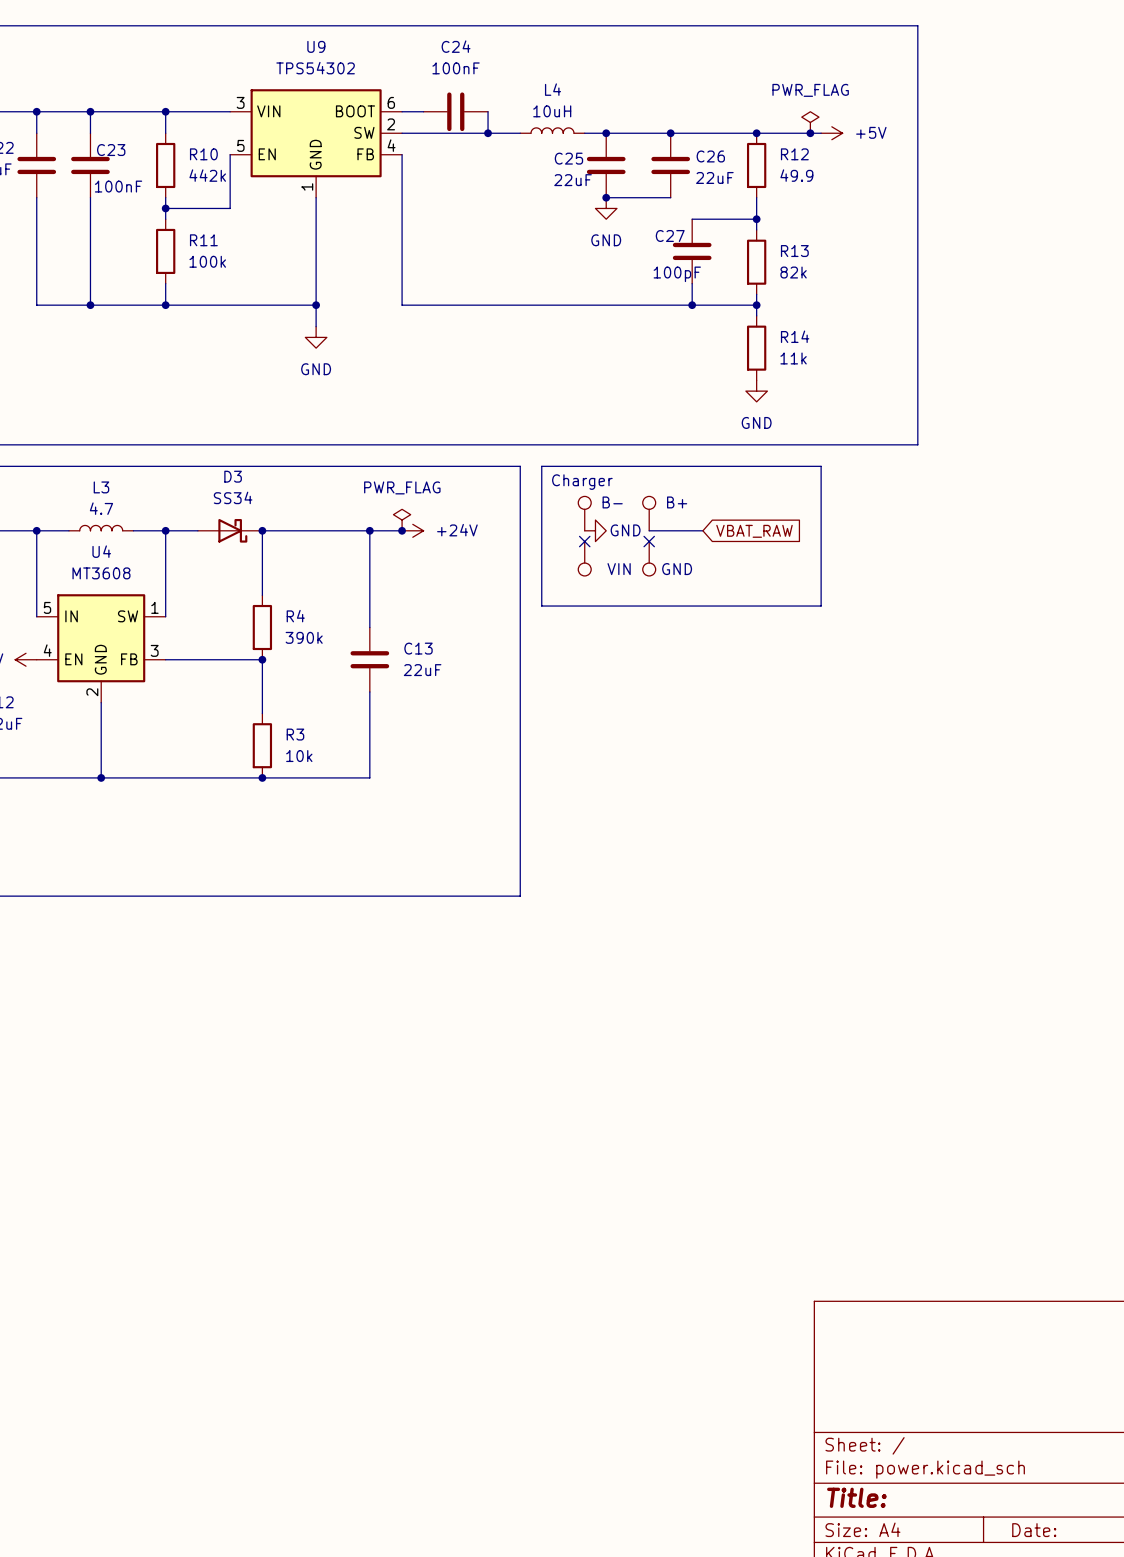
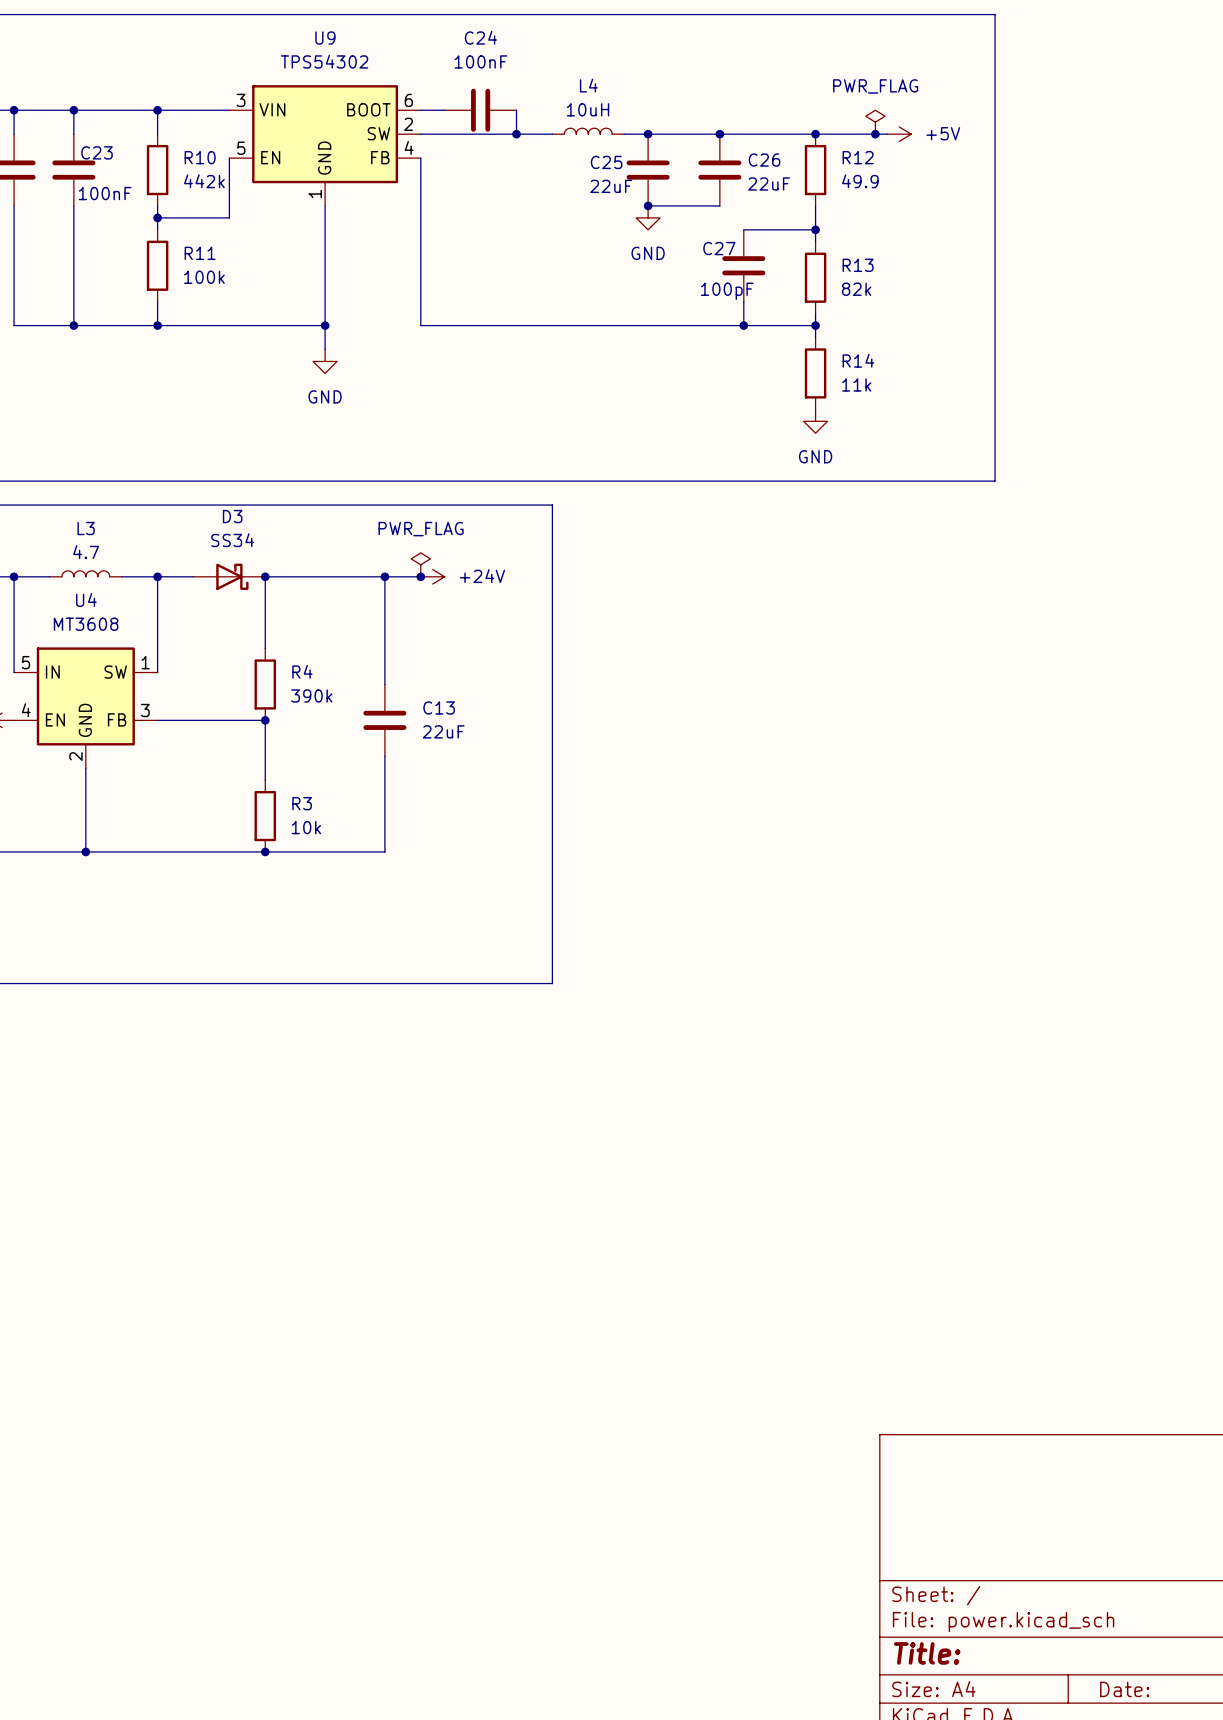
line: (541, 466) (821, 466) (821, 606) (541, 606) (541, 466) -> none
text: Charger (582, 482) -> none
part: B- (584, 513) -> none
part: B+ (649, 513) -> none
power symbol: GND (595, 530) -> none
wire: (649, 530) (702, 530) -> none
global label: VBAT_RAW (754, 531) -> none
no-connect mark: (584, 541) -> none
no-connect mark: (649, 541) -> none
part: VIN (584, 558) -> none
part: GND (649, 558) -> none

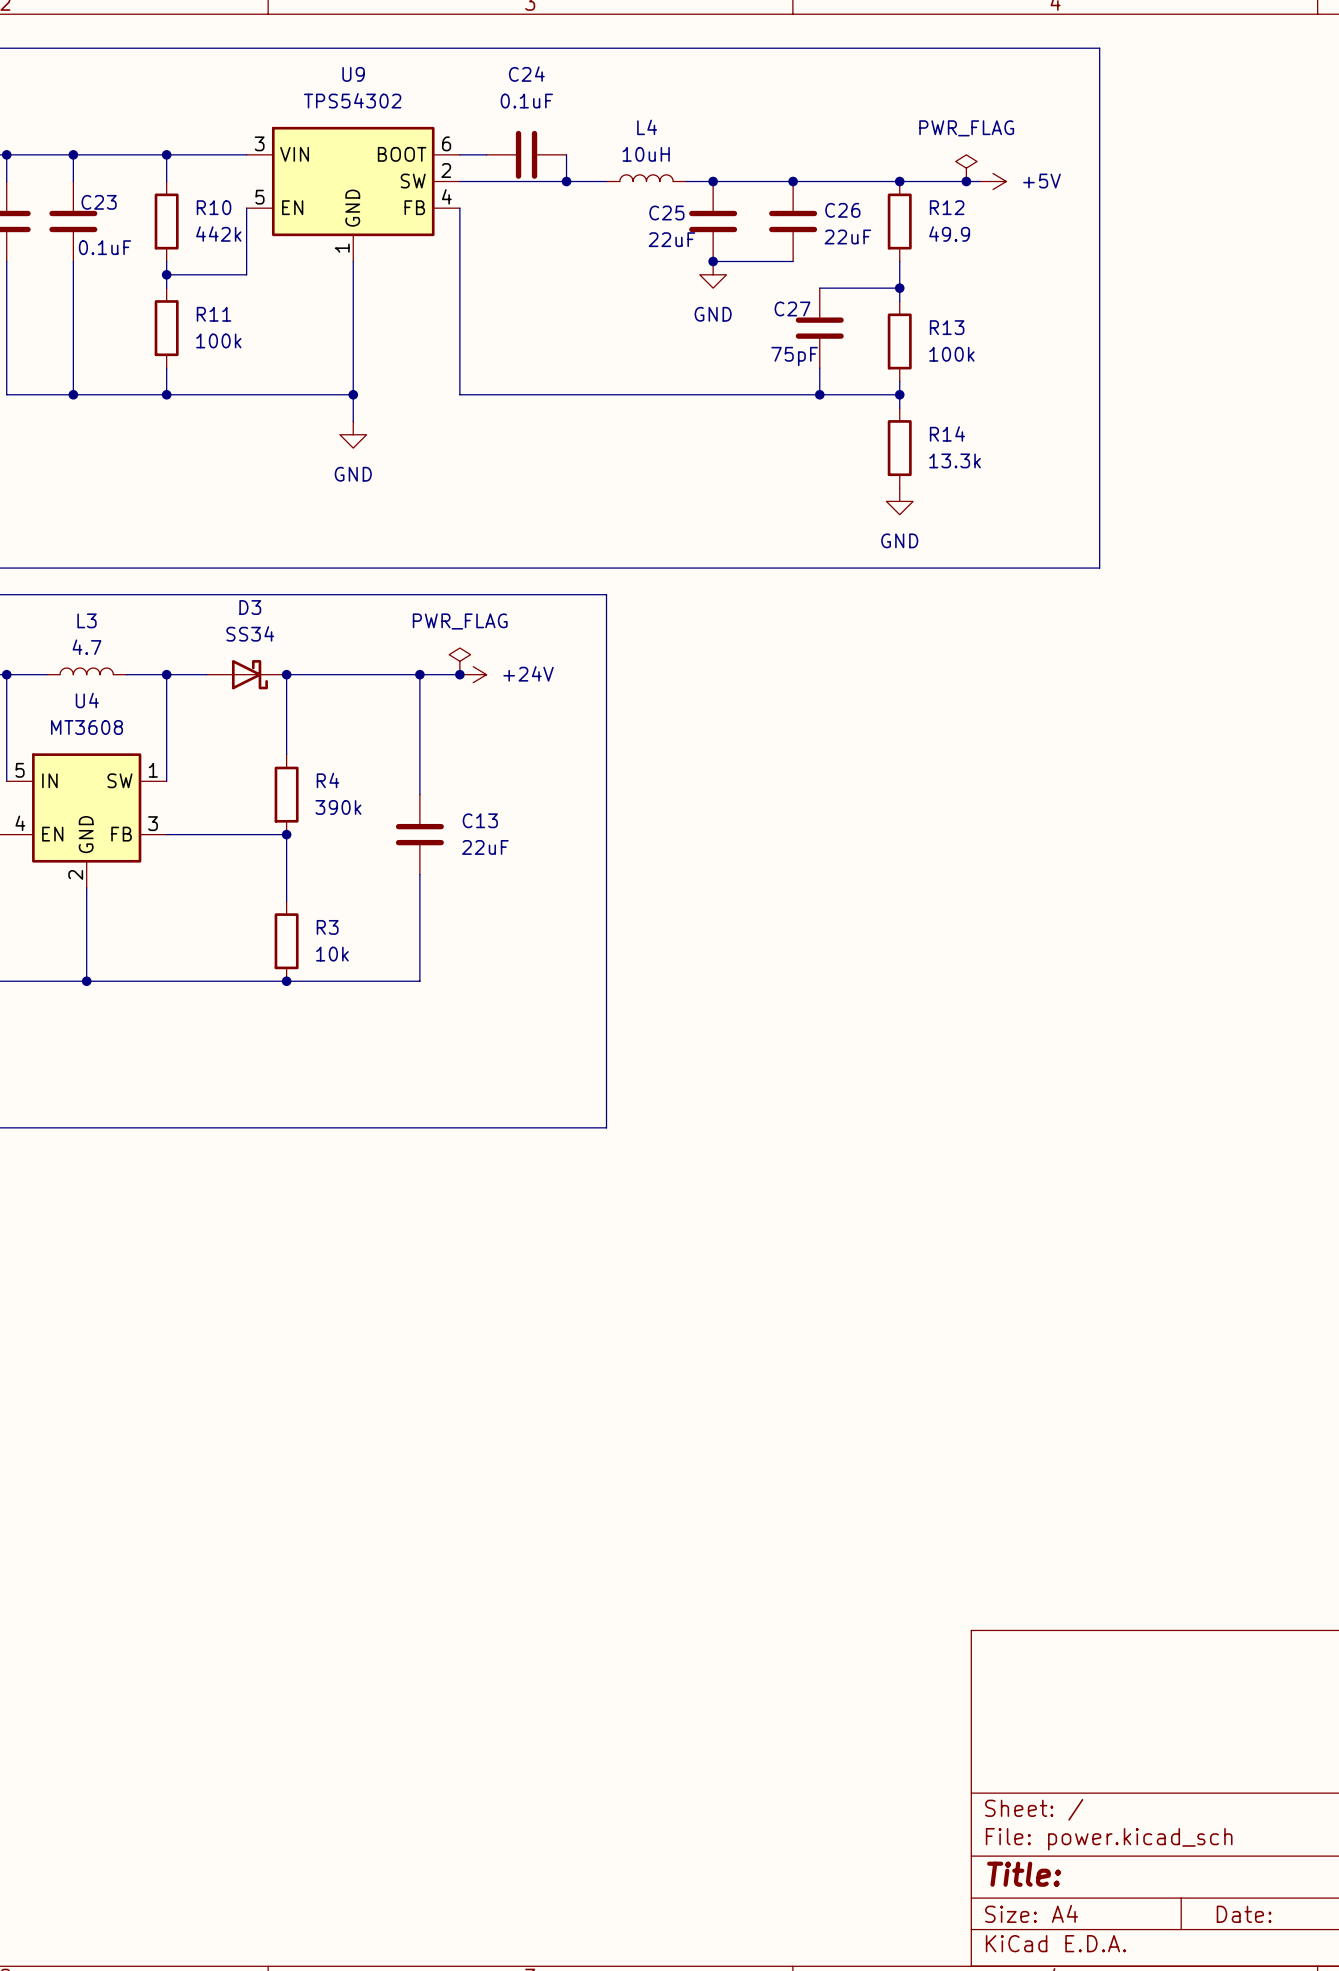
C24 value: 100nF (480, 61) -> 0.1uF (526, 101)
C23 value: 100nF (105, 193) -> 0.1uF (105, 247)
R13 value: 82k (856, 289) -> 100k (951, 354)
C27 value: 100pF (727, 291) -> 75pF (794, 356)
R14 value: 11k (856, 384) -> 13.3k (955, 460)

